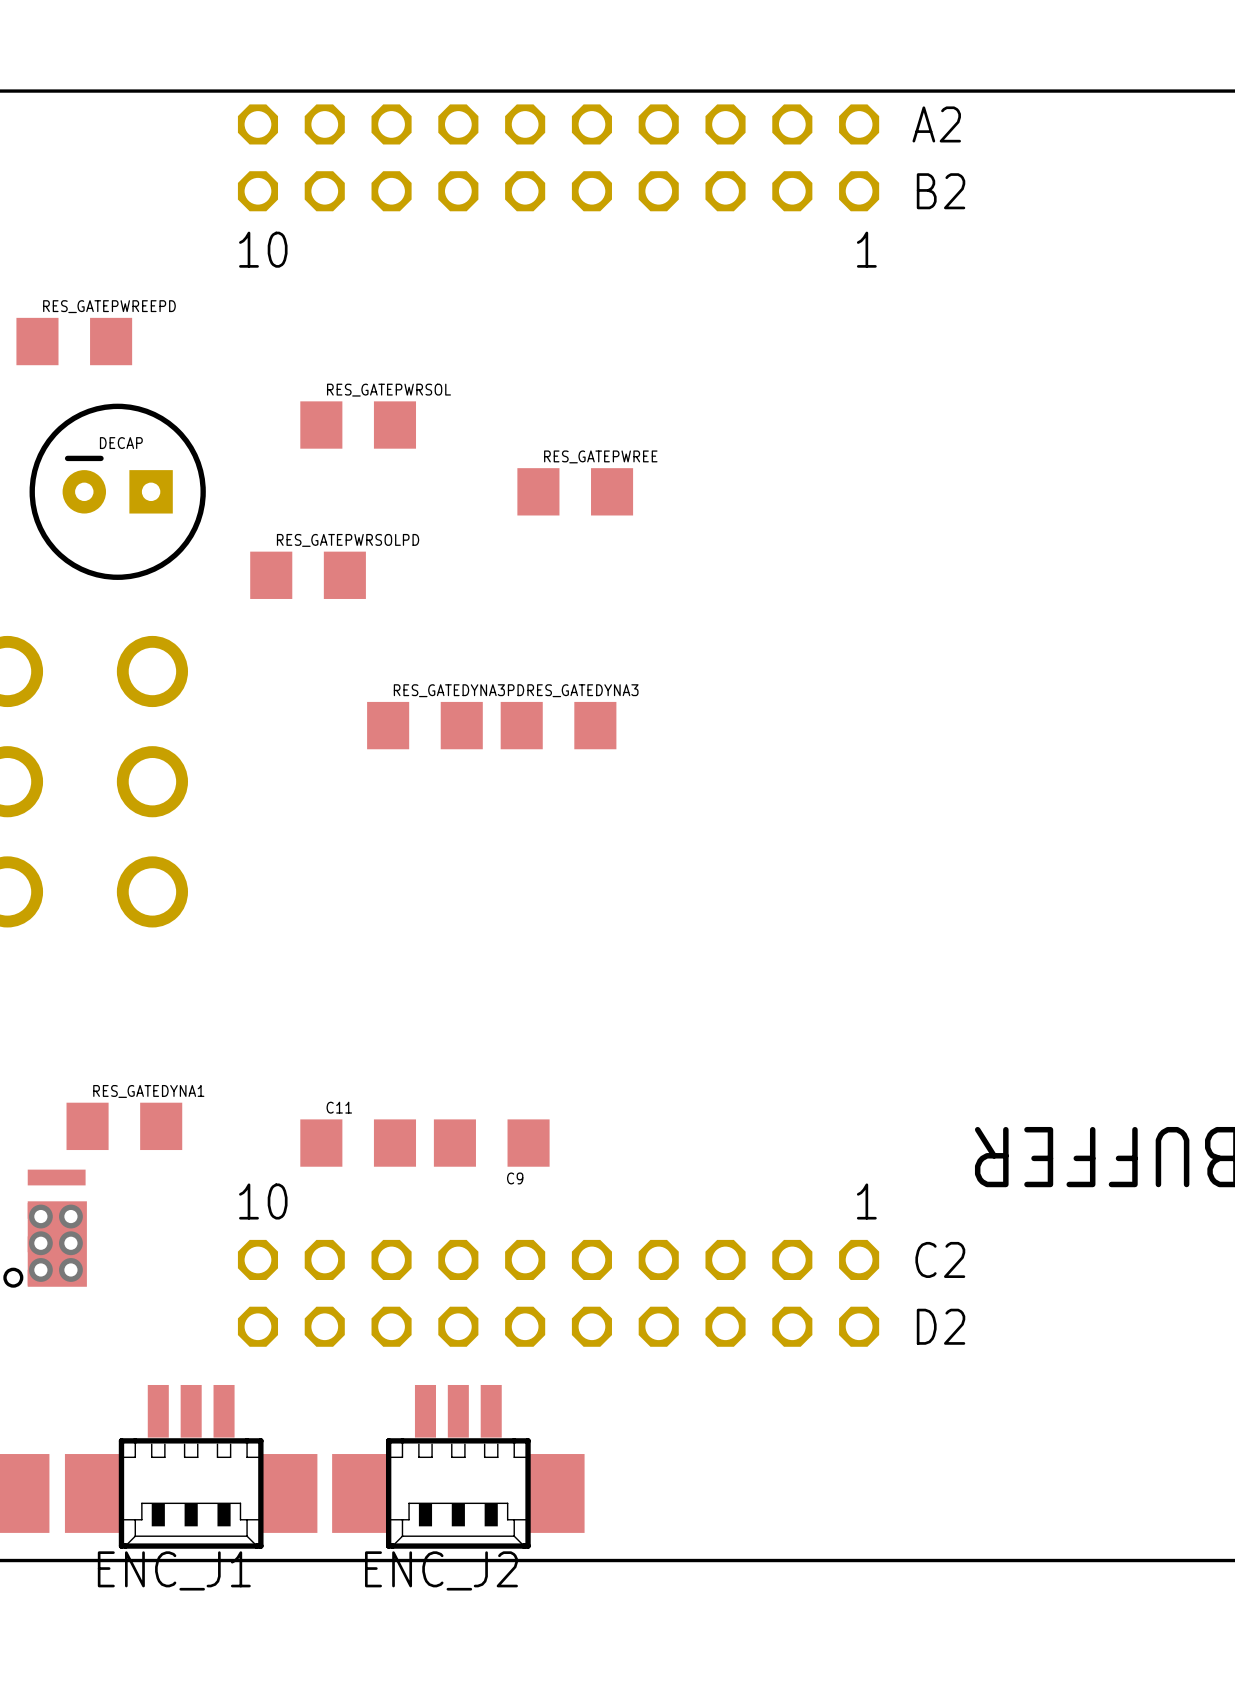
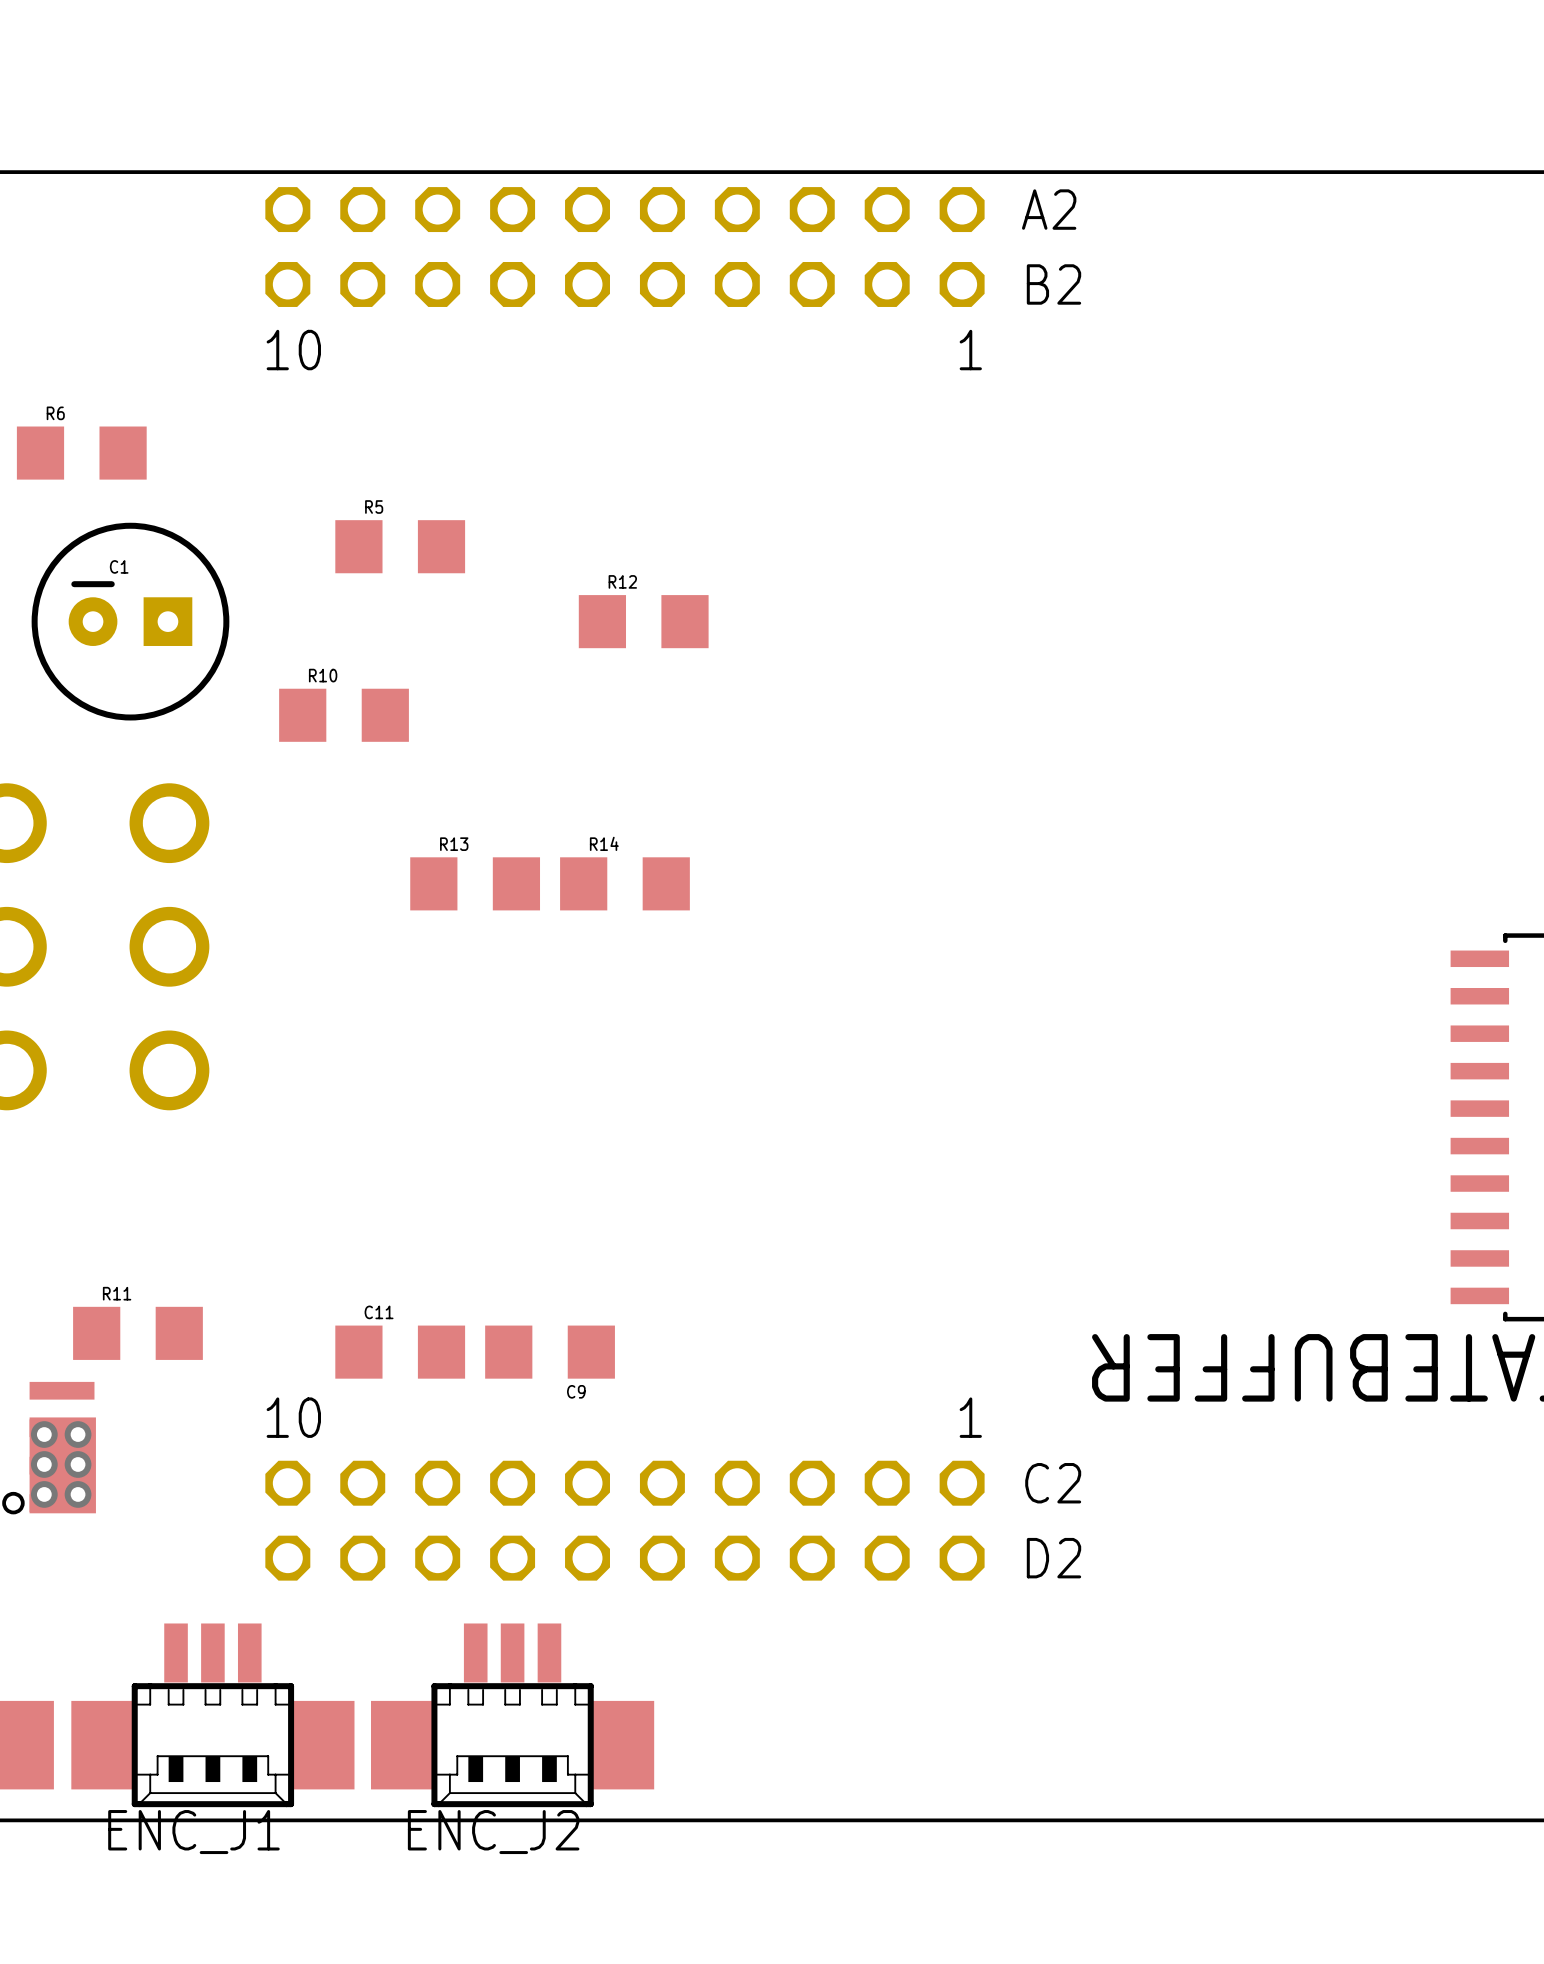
RES_GATEPWREEPD name: RES_GATEPWREEPD (109, 306) -> R6 (55, 413)
RES_GATEPWRSOL name: RES_GATEPWRSOL (388, 390) -> R5 (374, 507)
DECAP name: DECAP (121, 443) -> C1 (119, 566)
RES_GATEPWREE name: RES_GATEPWREE (600, 456) -> R12 (622, 581)
RES_GATEPWRSOLPD name: RES_GATEPWRSOLPD (348, 540) -> R10 (323, 675)
RES_GATEDYNA3PD name: RES_GATEDYNA3PD (458, 690) -> R13 (454, 844)
RES_GATEDYNA3 name: RES_GATEDYNA3 (582, 690) -> R14 (604, 843)
RES_GATEDYNA1 name: RES_GATEDYNA1 (148, 1091) -> R11 (117, 1293)

